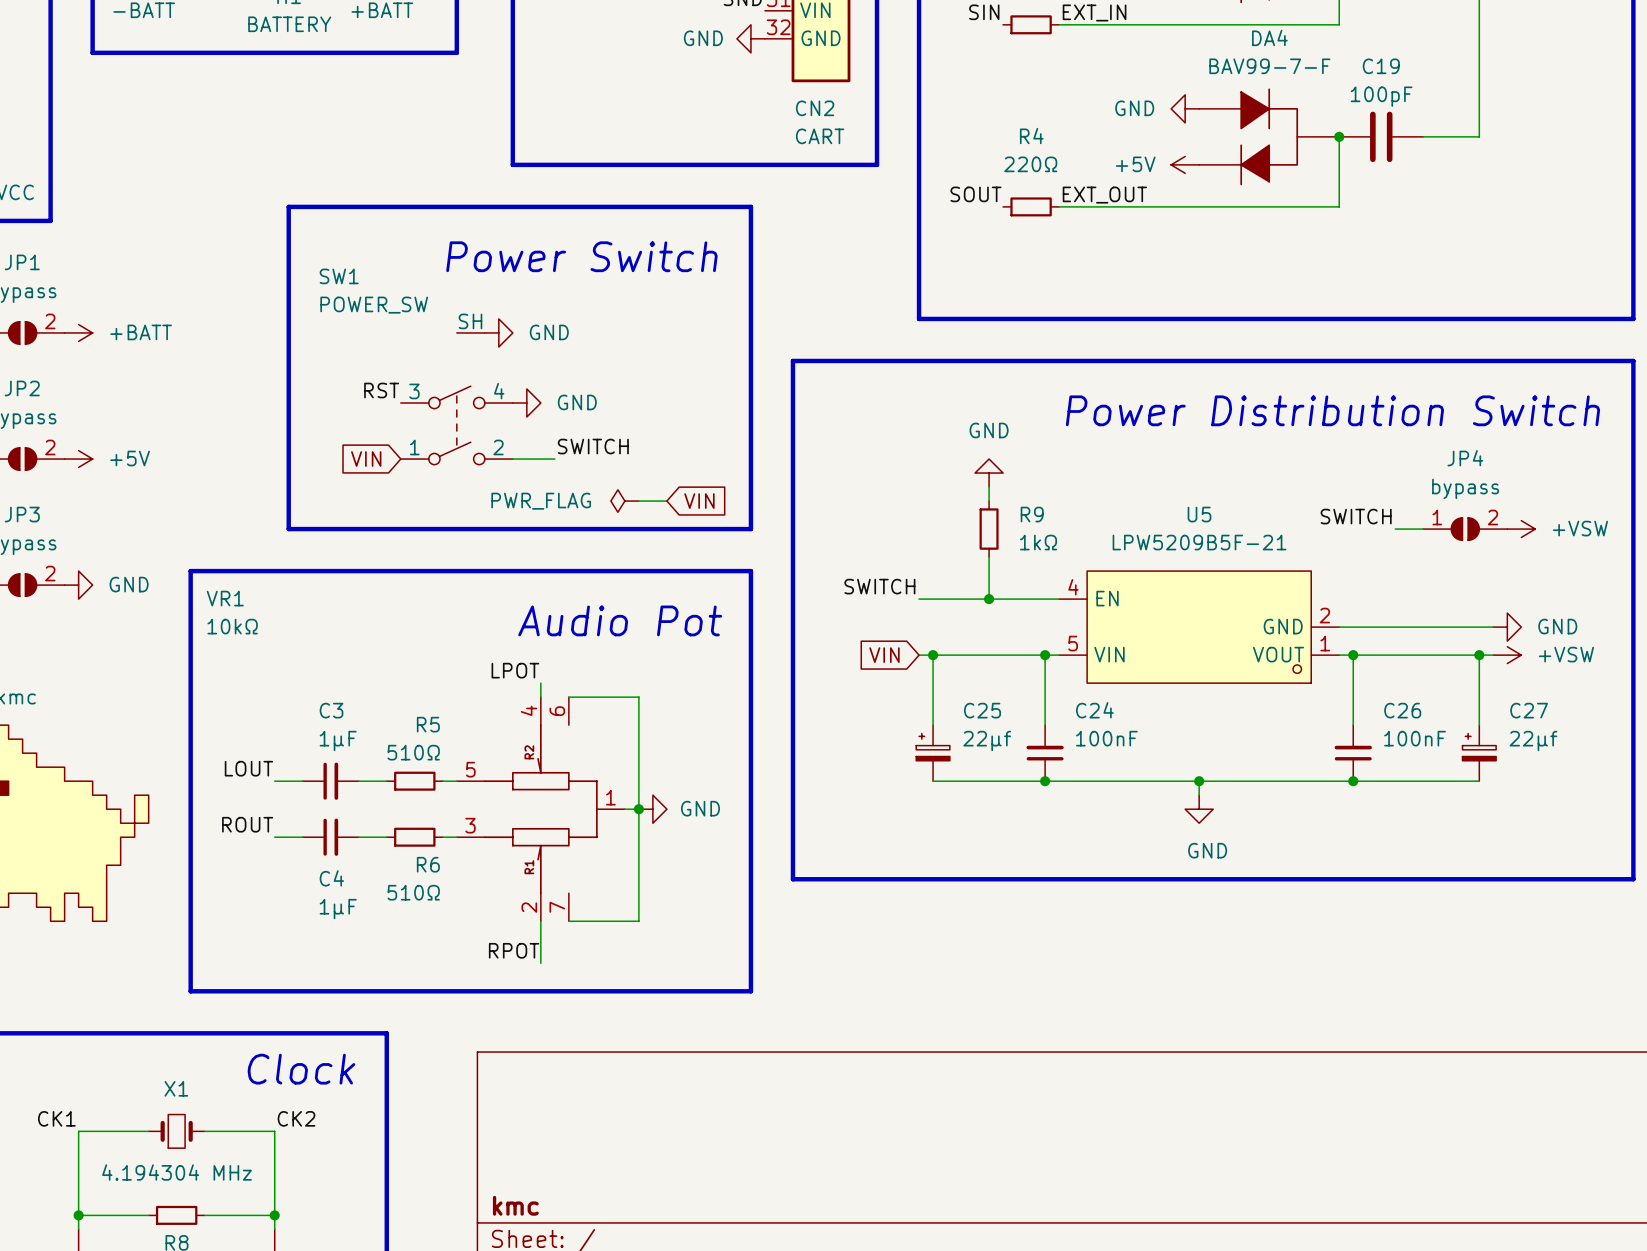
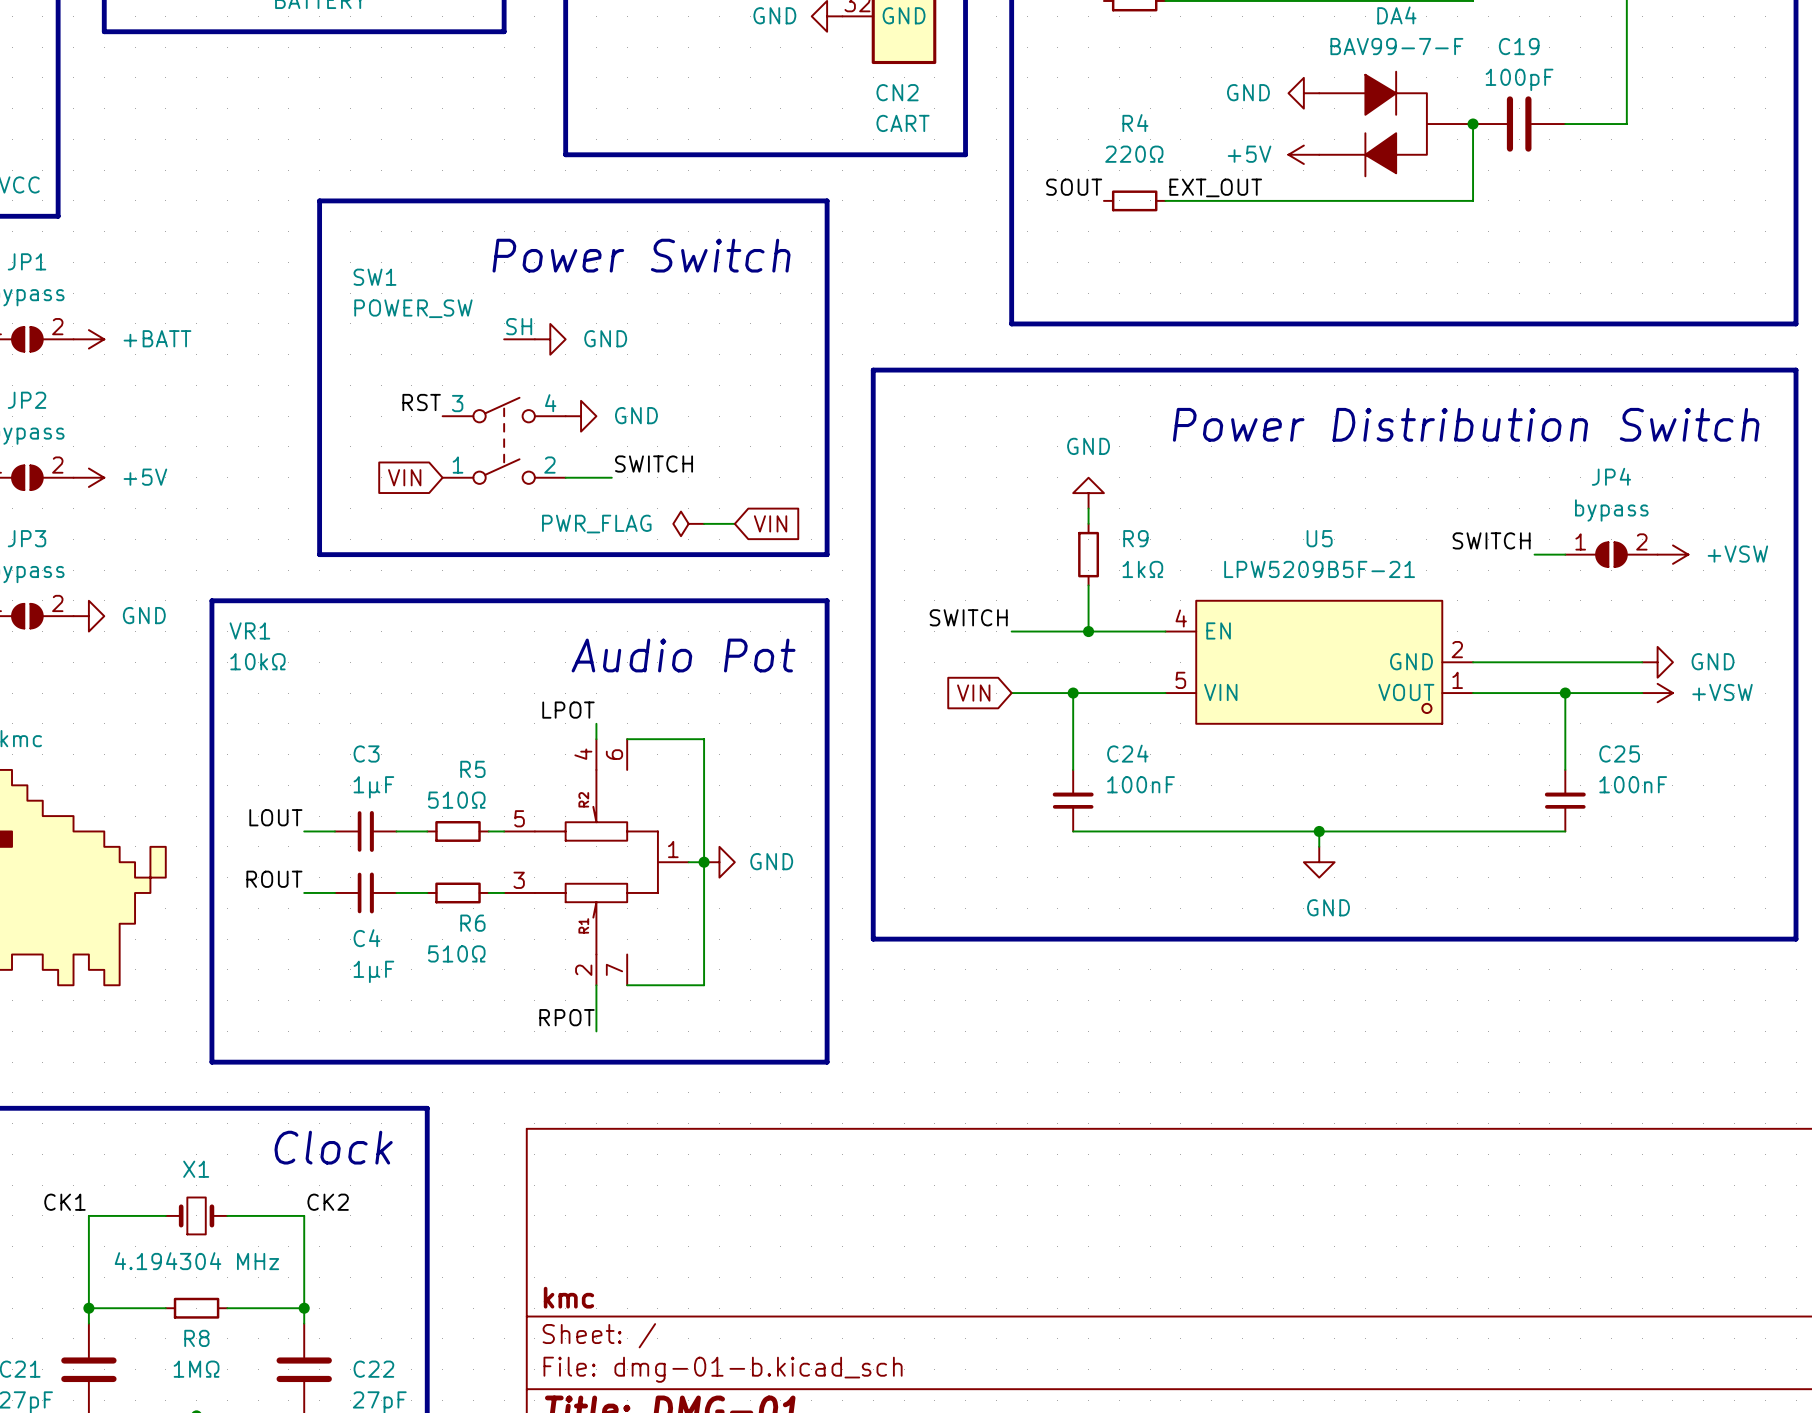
wire: (933, 655) (933, 725) -> (1073, 693) (1073, 769)
junction: (933, 655) -> none
junction: none -> (1073, 693)
wire: (1045, 655) (1045, 725) -> none
junction: (1045, 655) -> none
wire: (1353, 655) (1353, 725) -> none
junction: (1353, 655) -> none
junction: none -> (1565, 693)
wire: (1479, 655) (1479, 725) -> (1565, 693) (1565, 769)
junction: (1479, 655) -> none
C25 symbol: [916, 725, 950, 782] -> [1544, 769, 1586, 832]
C25 value: 22µf (987, 740) -> 100nF (1633, 784)
C24 position: (1045, 753) -> (1073, 800)
C26: 100nF (1353, 753) -> none
C27: 22µf (1479, 753) -> none
wire: (933, 781) (975, 781) -> none
junction: (1045, 781) -> none
junction: (1353, 781) -> none
wire: (1423, 781) (1479, 781) -> none

